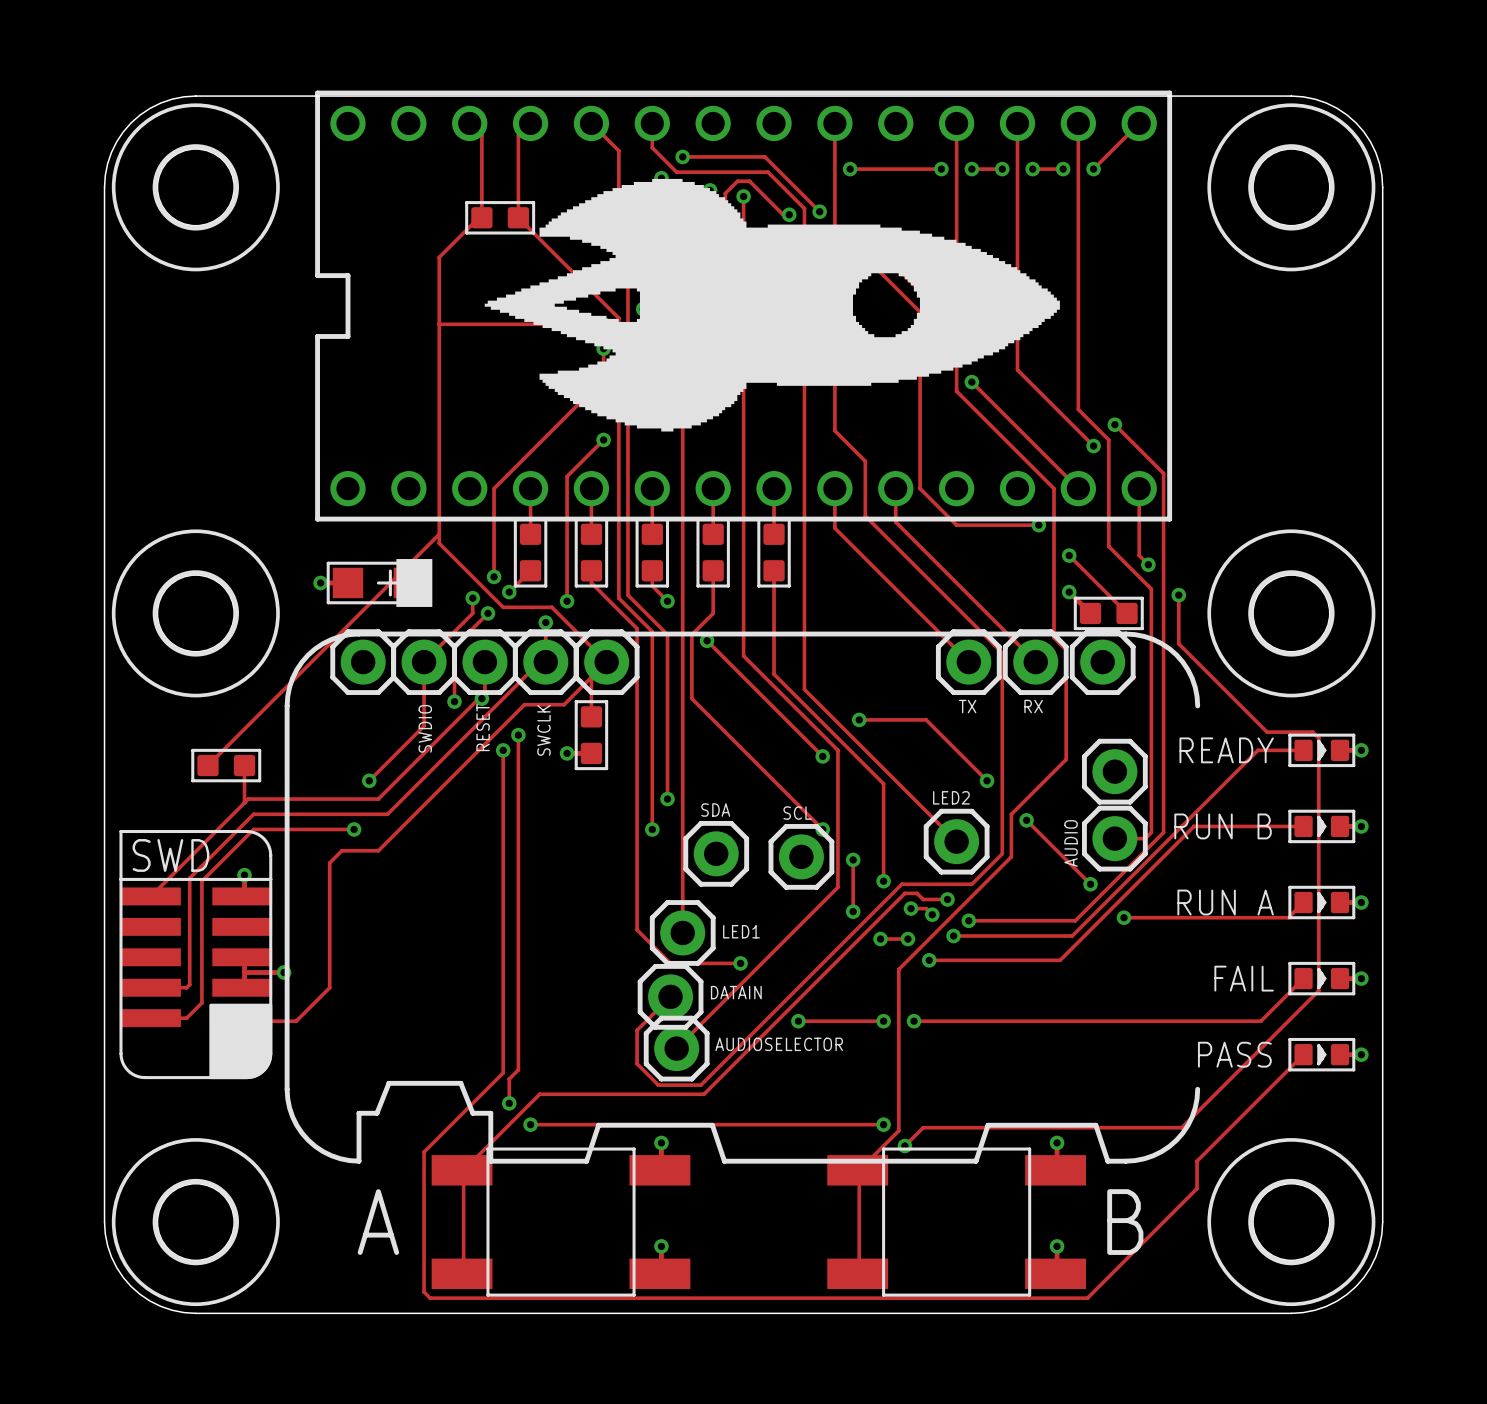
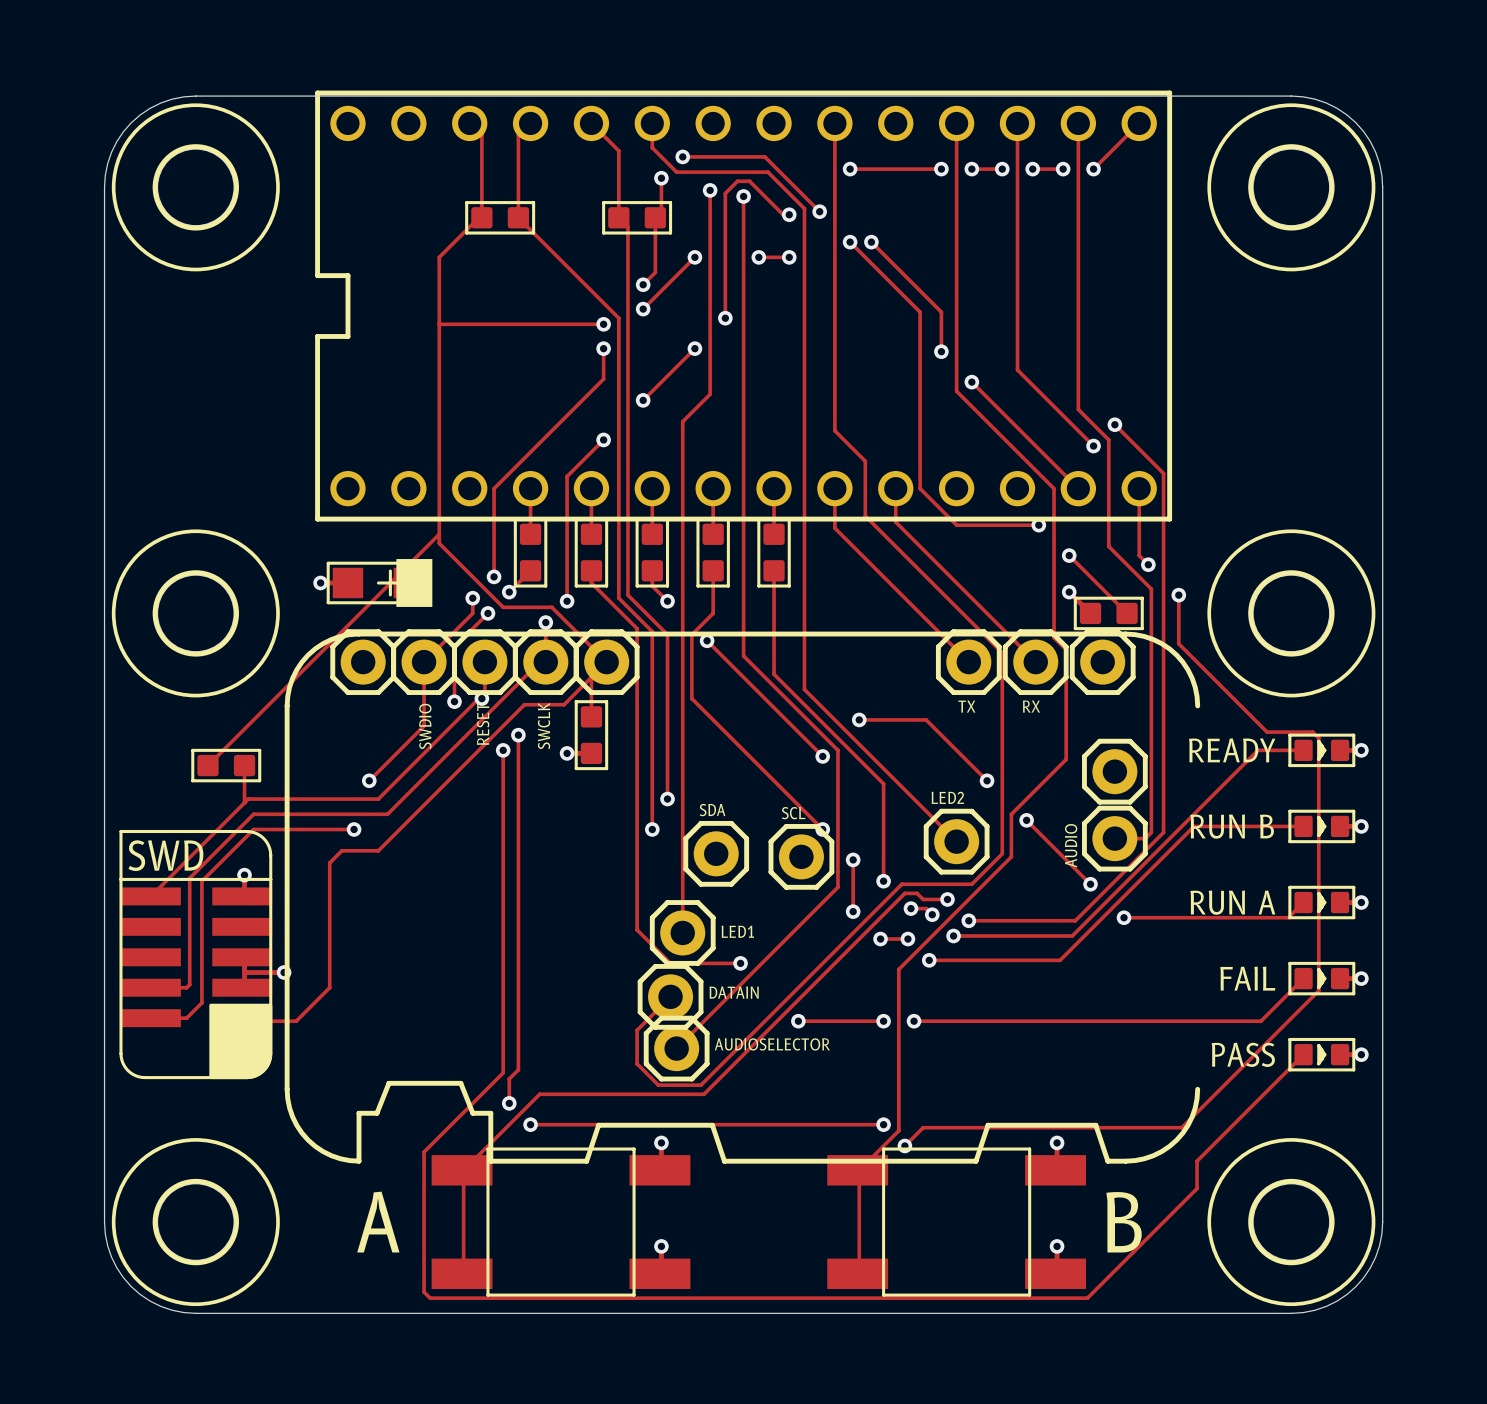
drawing: [484, 178, 1060, 432] -> none

